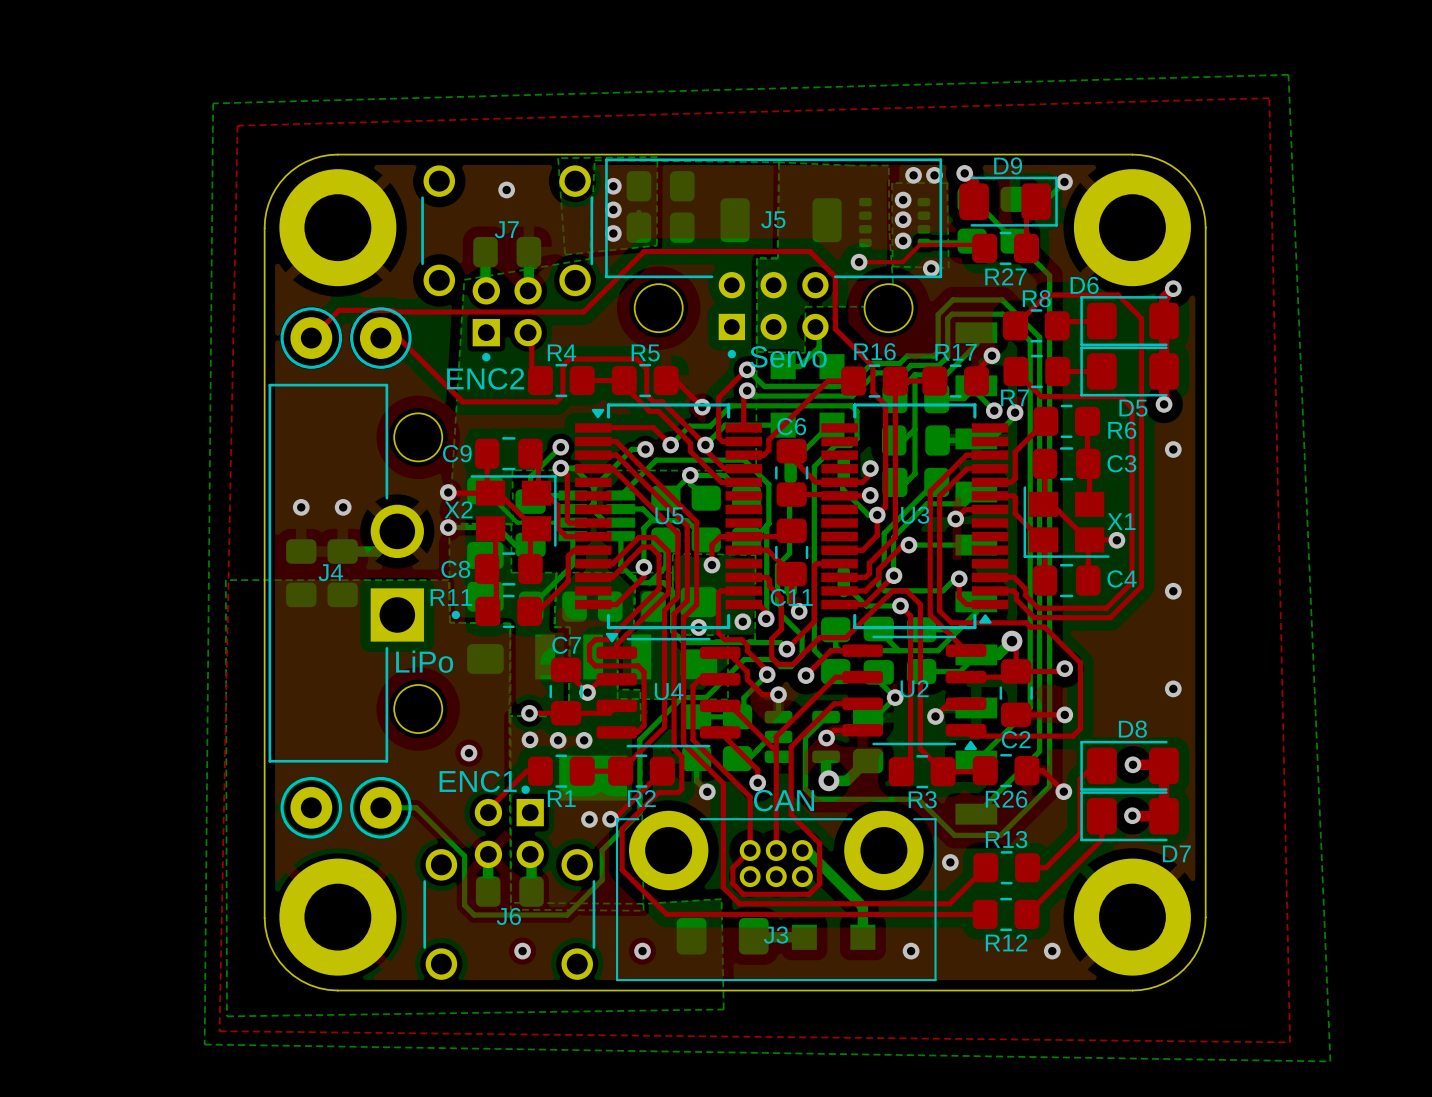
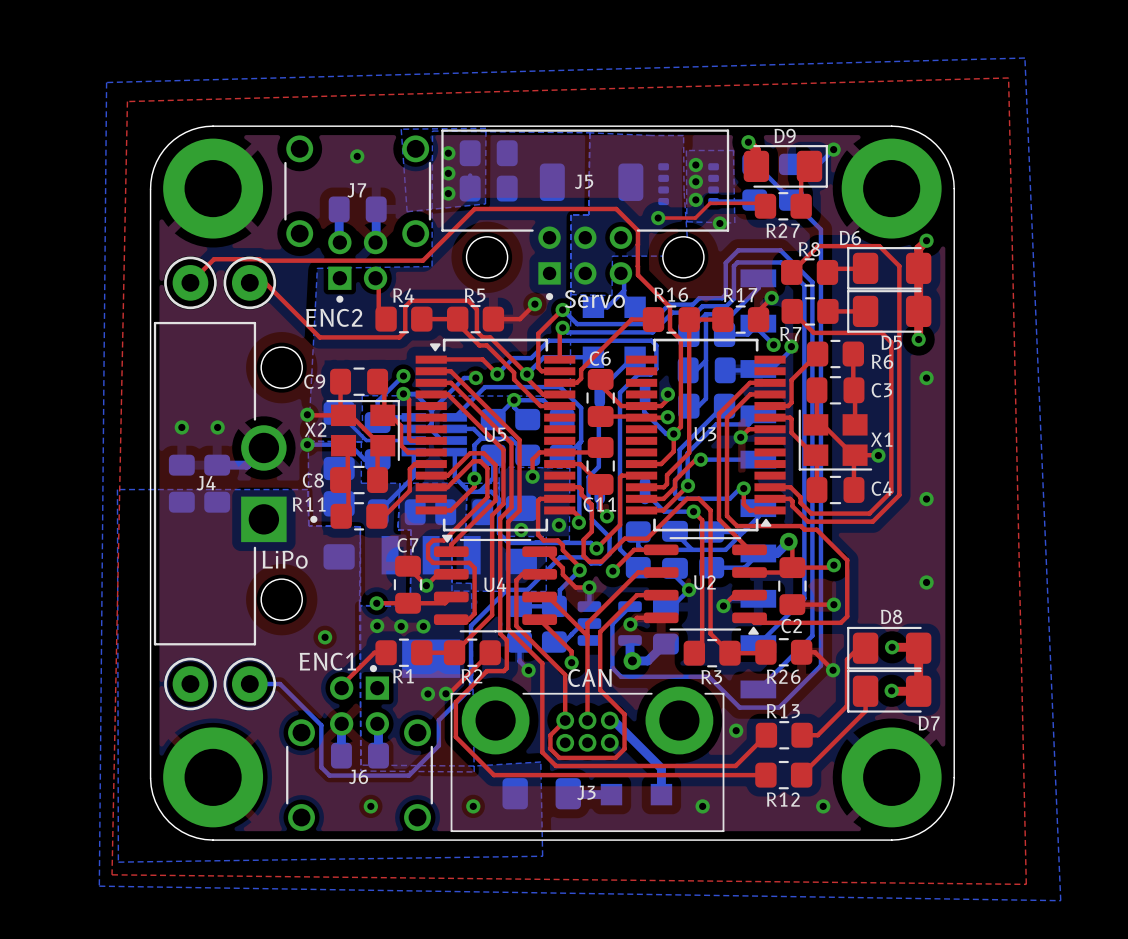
bottom zone outline: (594, 160) (589, 258) (464, 279) (449, 523) -> (432, 131) (432, 266) (317, 268) (308, 441)
via: (913, 175) -> none
via: (934, 175) -> none
top track: (675, 380) (702, 407) -> (501, 319) (519, 319) (534, 304)
via position: (702, 407) -> (534, 304)

